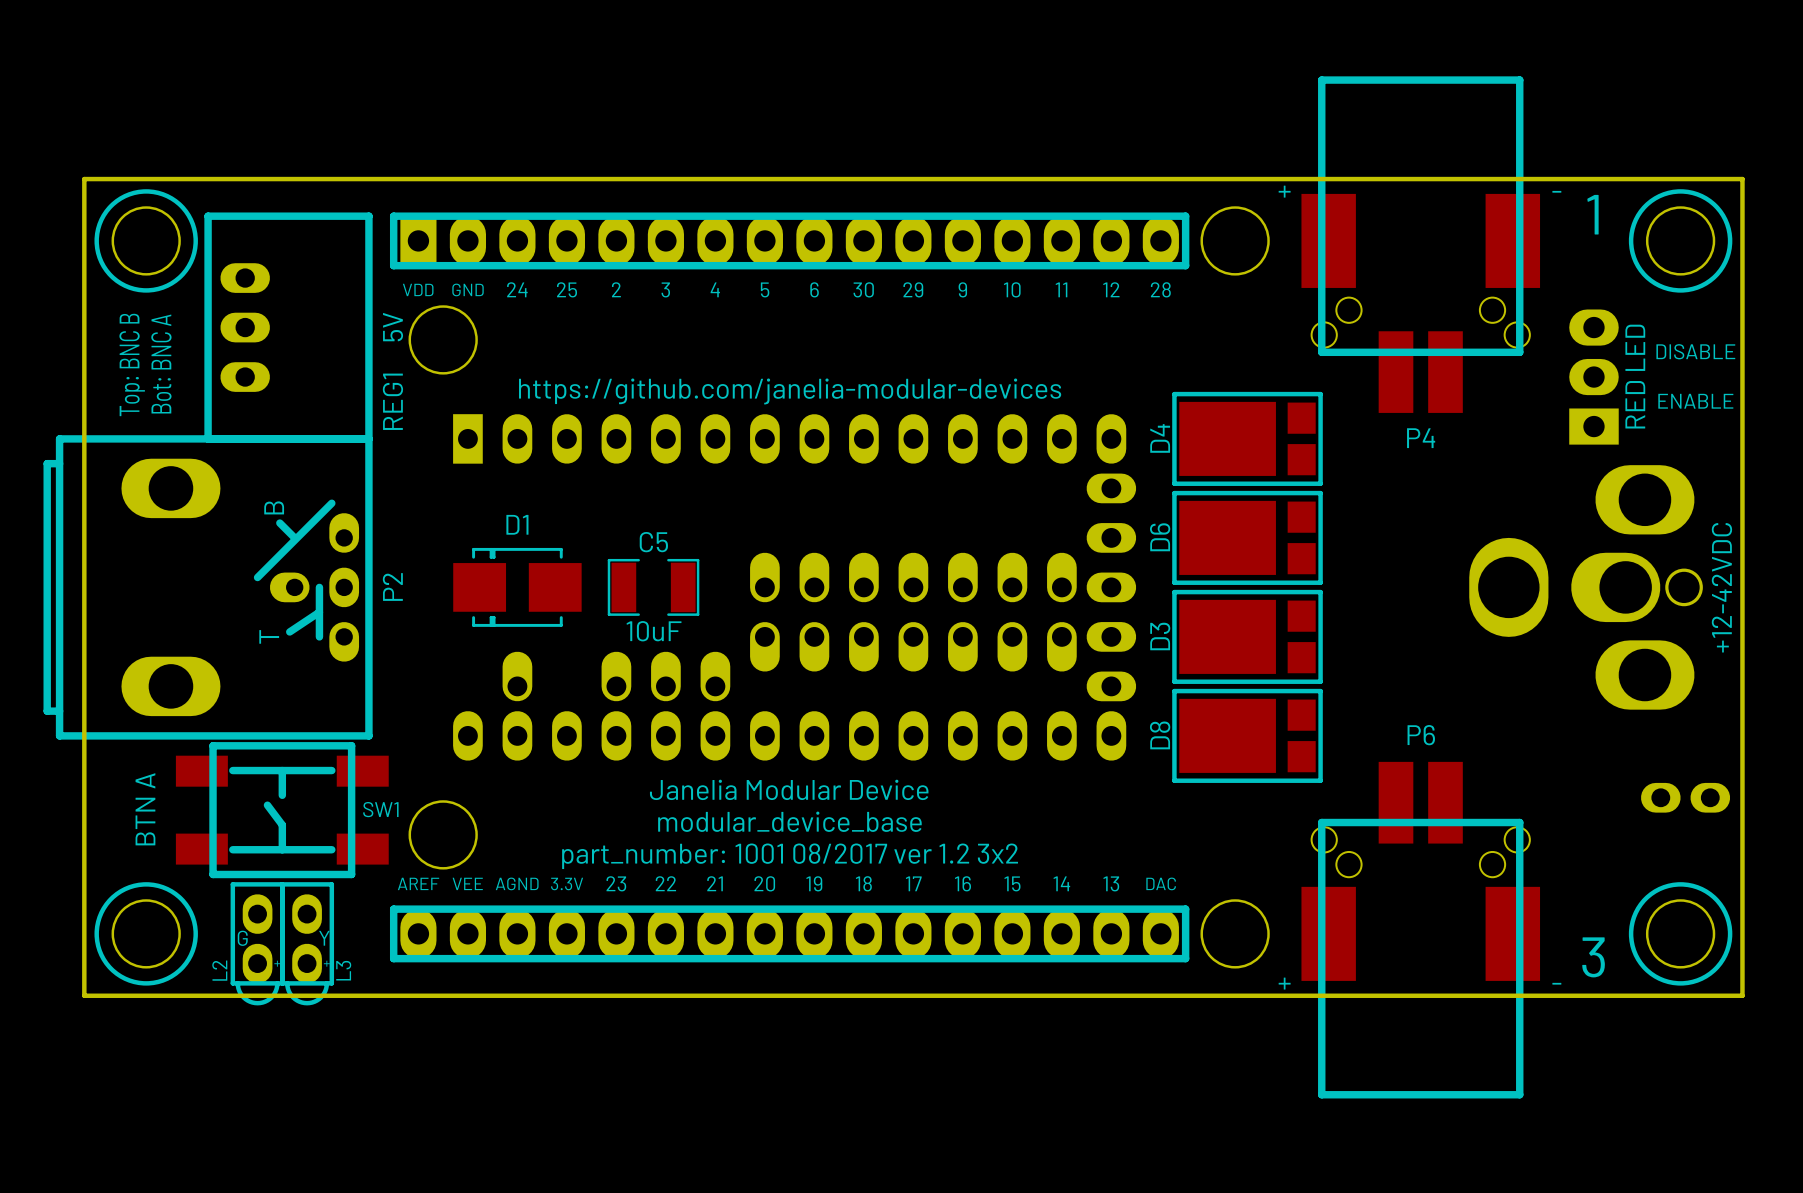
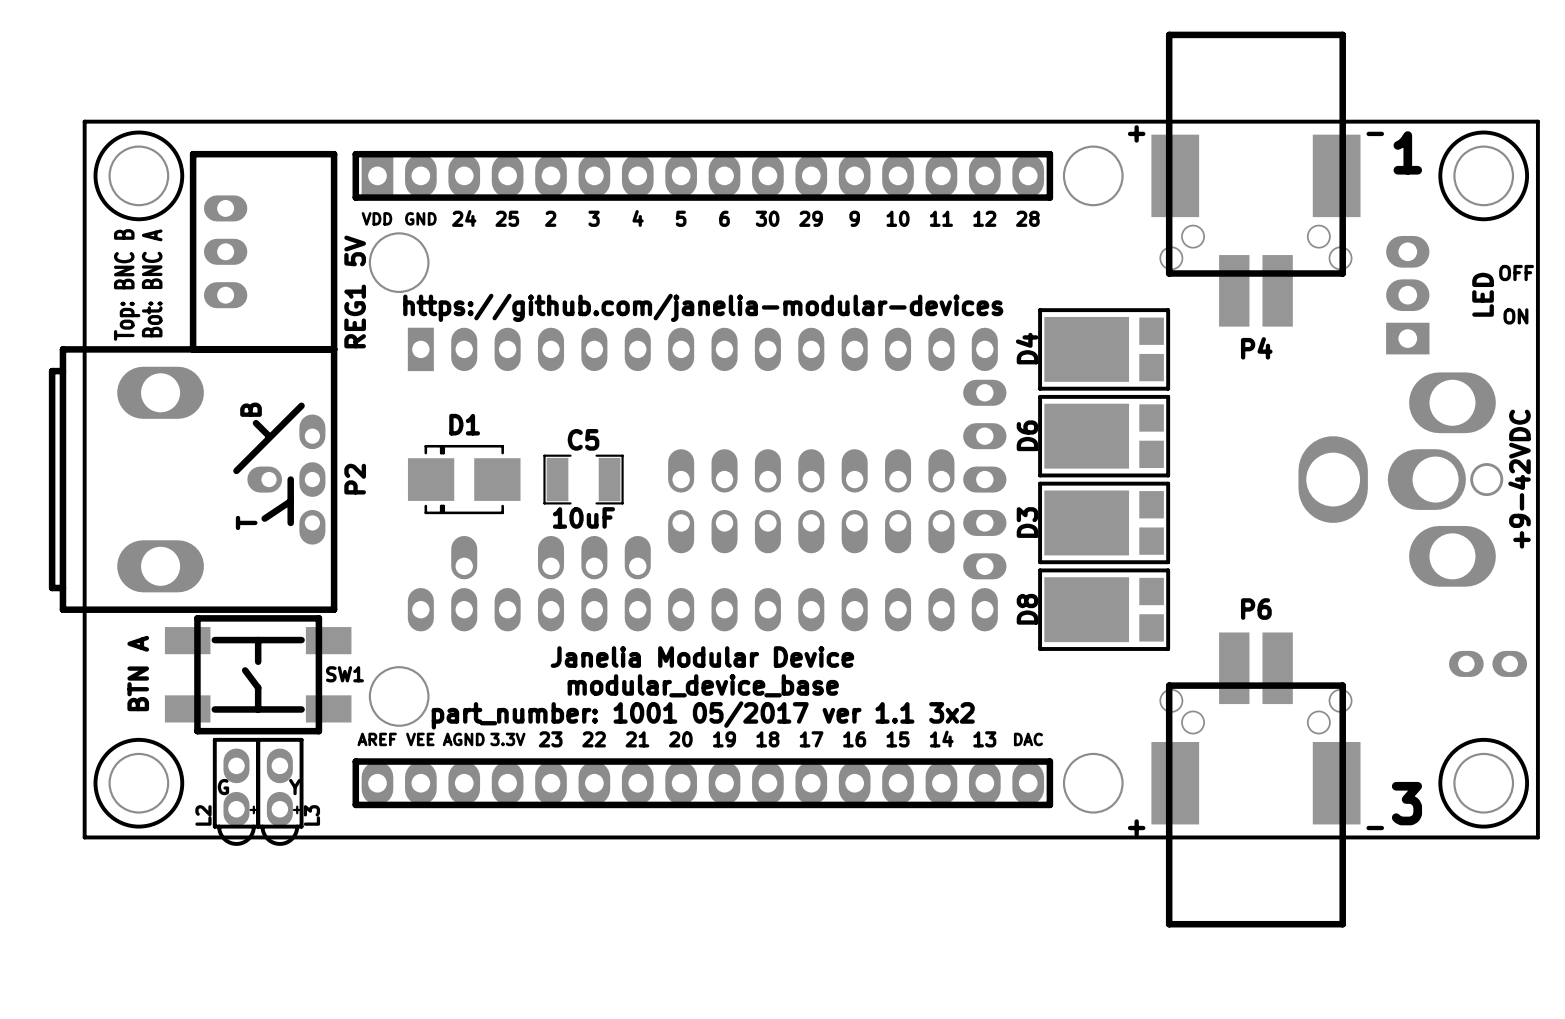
text: DISABLE (1695, 351) -> none
text: none -> OFF (1516, 273)
text: RED LED (1635, 376) -> none
text: none -> LED (1483, 294)
text: ENABLE (1695, 401) -> none
text: none -> ON (1515, 316)
text: +12-42VDC (1721, 587) -> +9-42VDC (1519, 479)
text: part_number: 1001 08/2017 ver 1.2 3x2 (790, 856) -> part_number: 1001 05/2017 ver 1.1 3x2 (703, 715)

